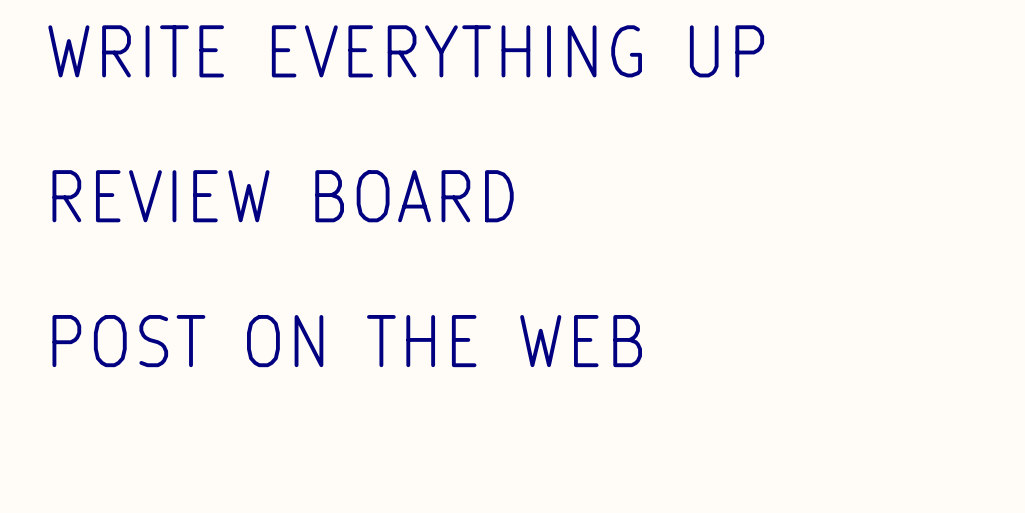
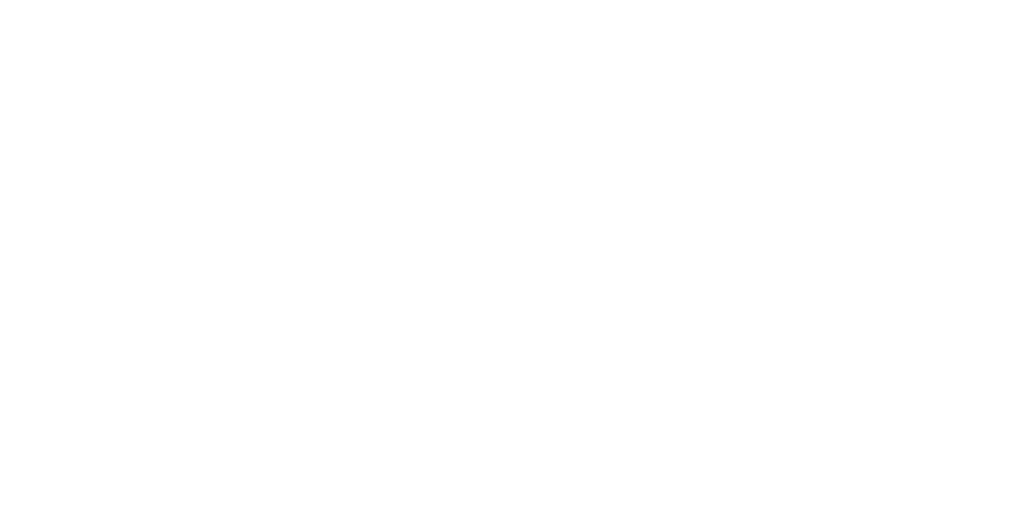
text: WRITE EVERYTHING UP (406, 51) -> none
text: REVIEW BOARD (283, 196) -> none
text: POST ON THE WEB (347, 341) -> none

